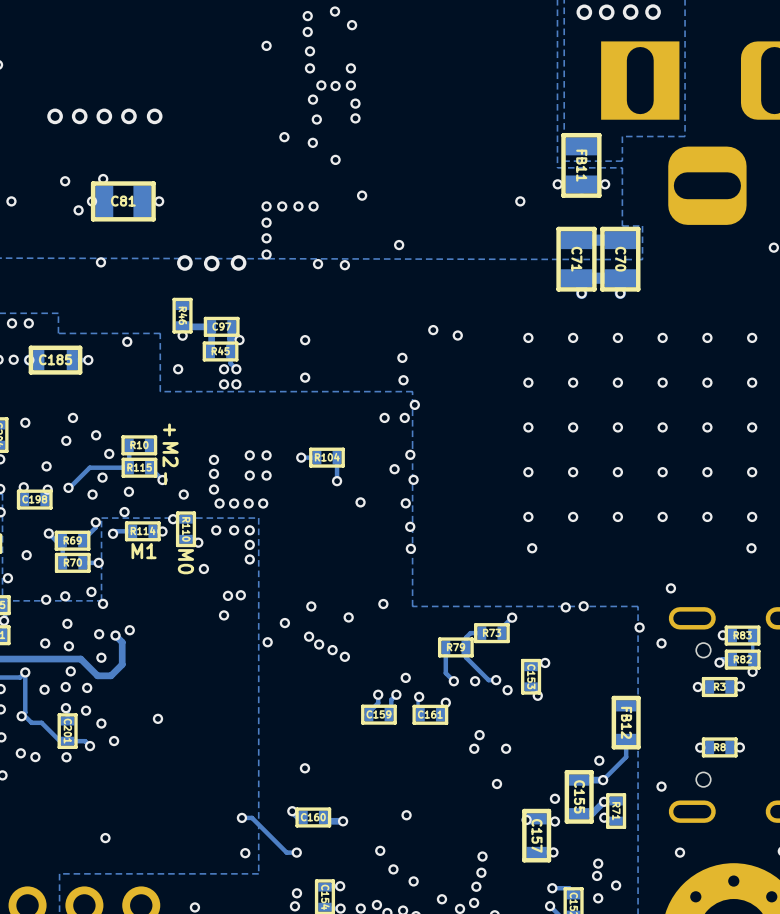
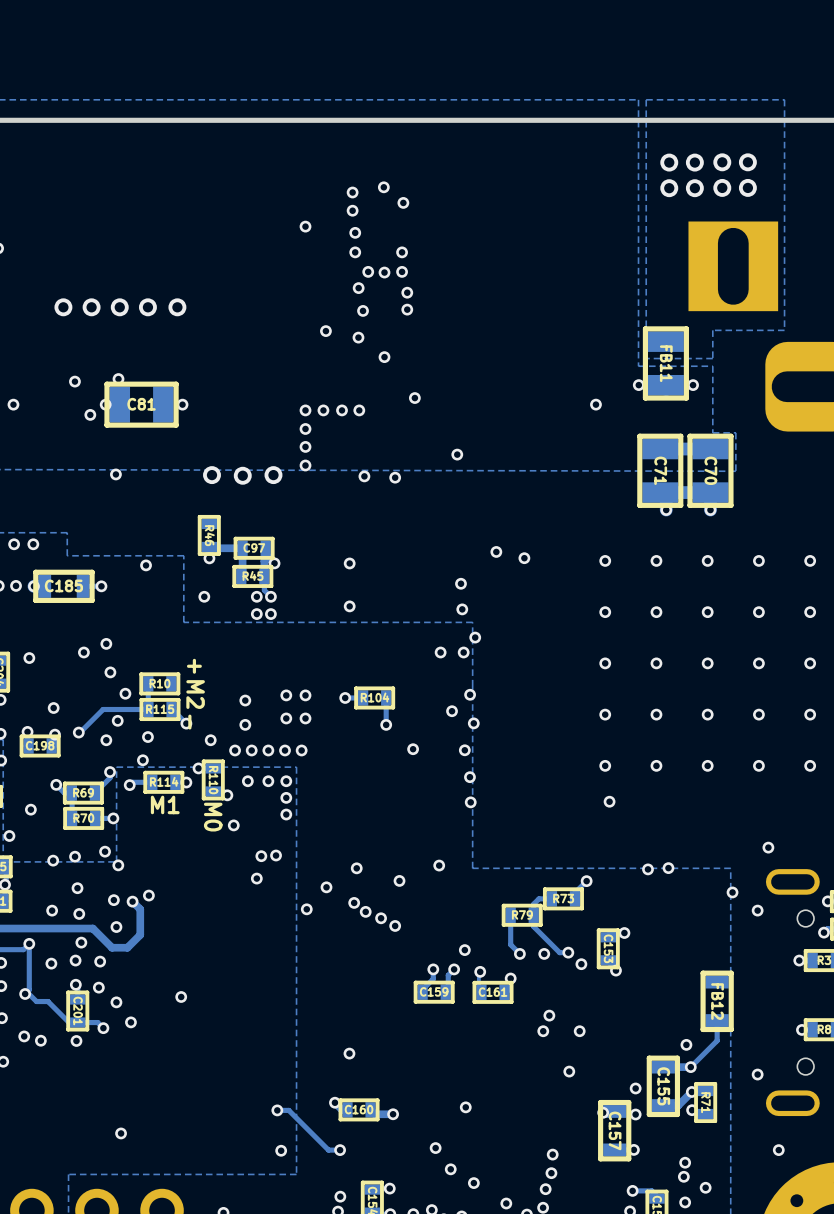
via position: (66, 440) -> (106, 643)
via: (213, 473) -> none
via: none -> (245, 724)
via: (213, 489) -> none
via: none -> (235, 750)

